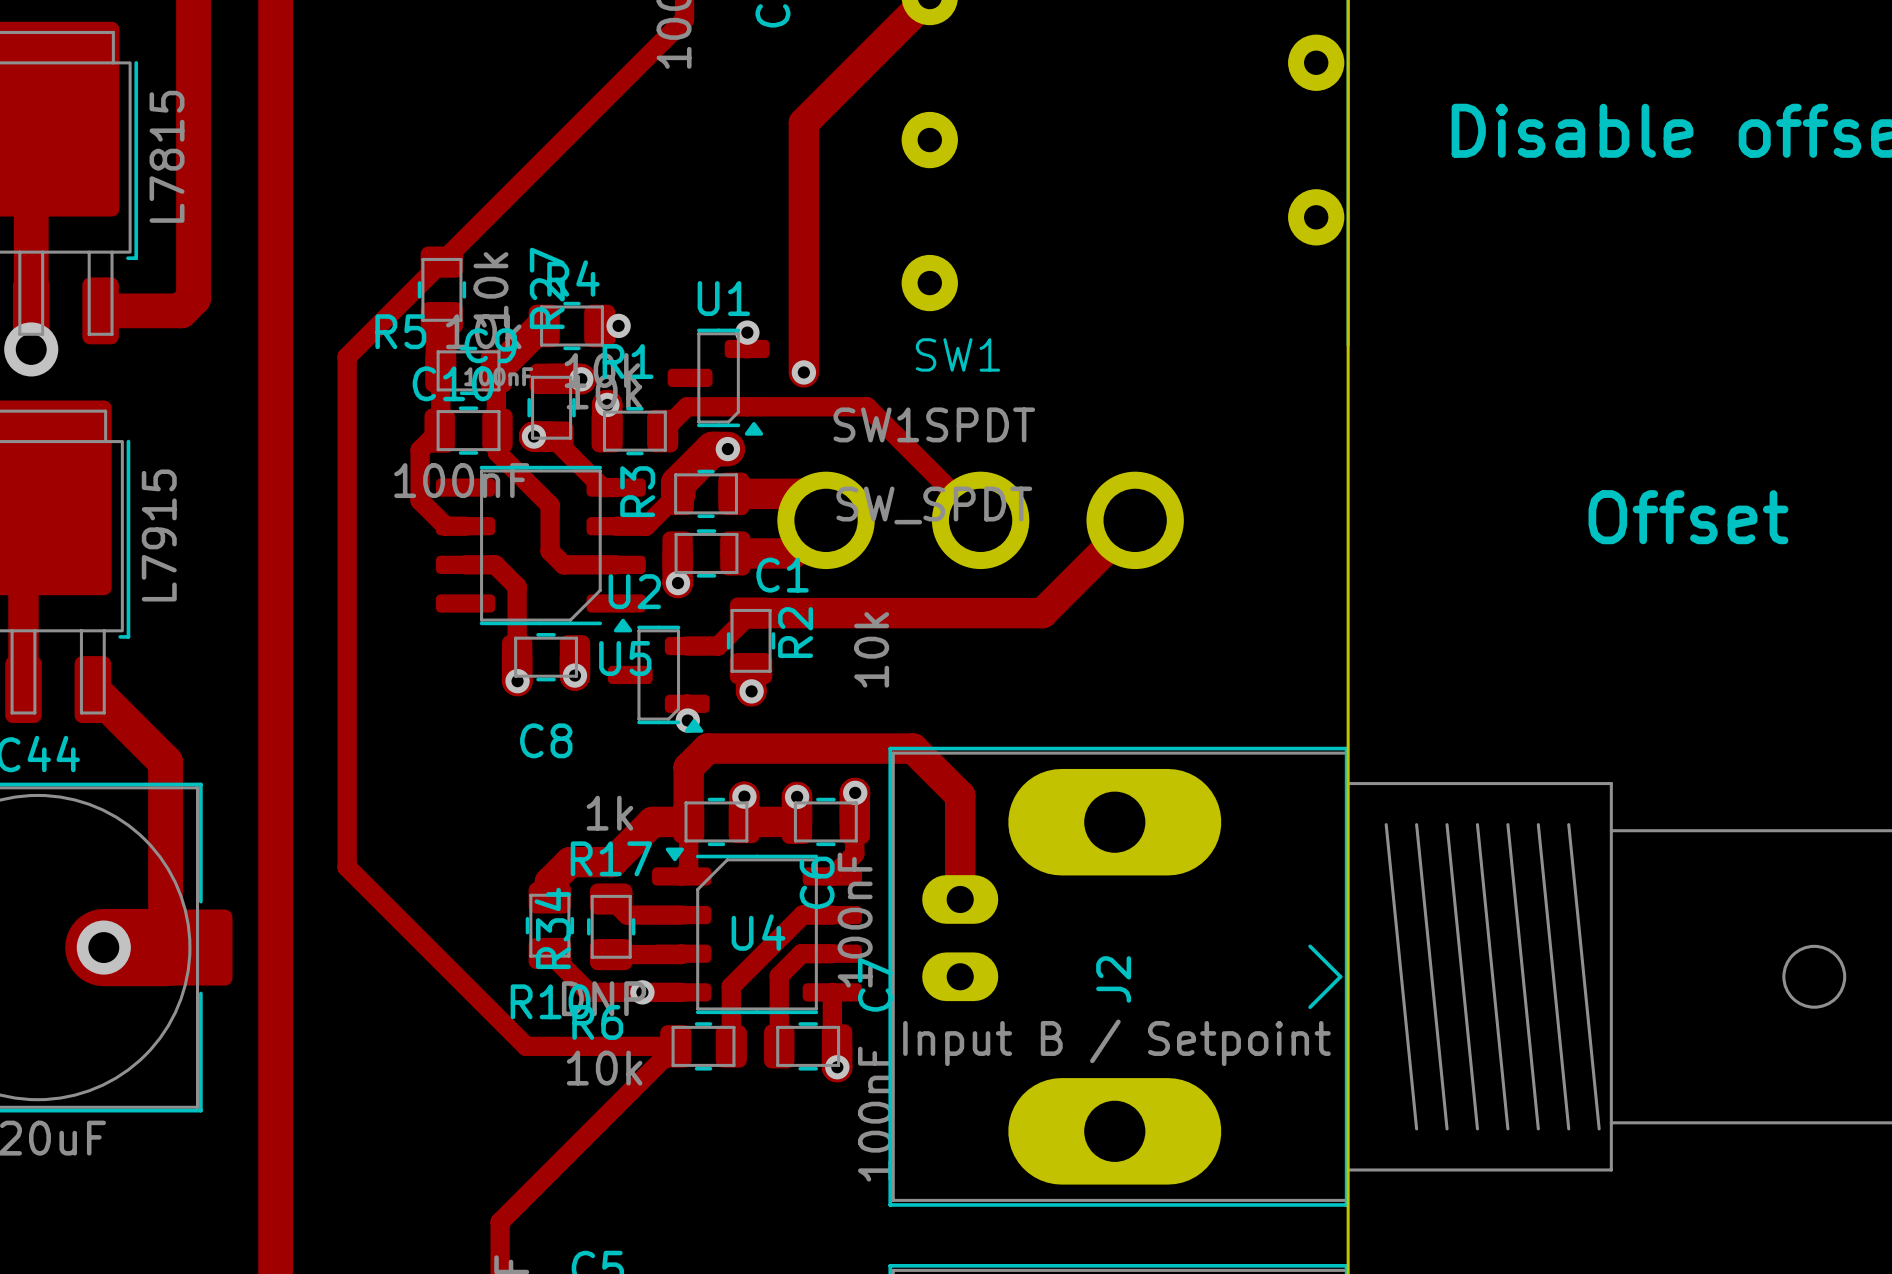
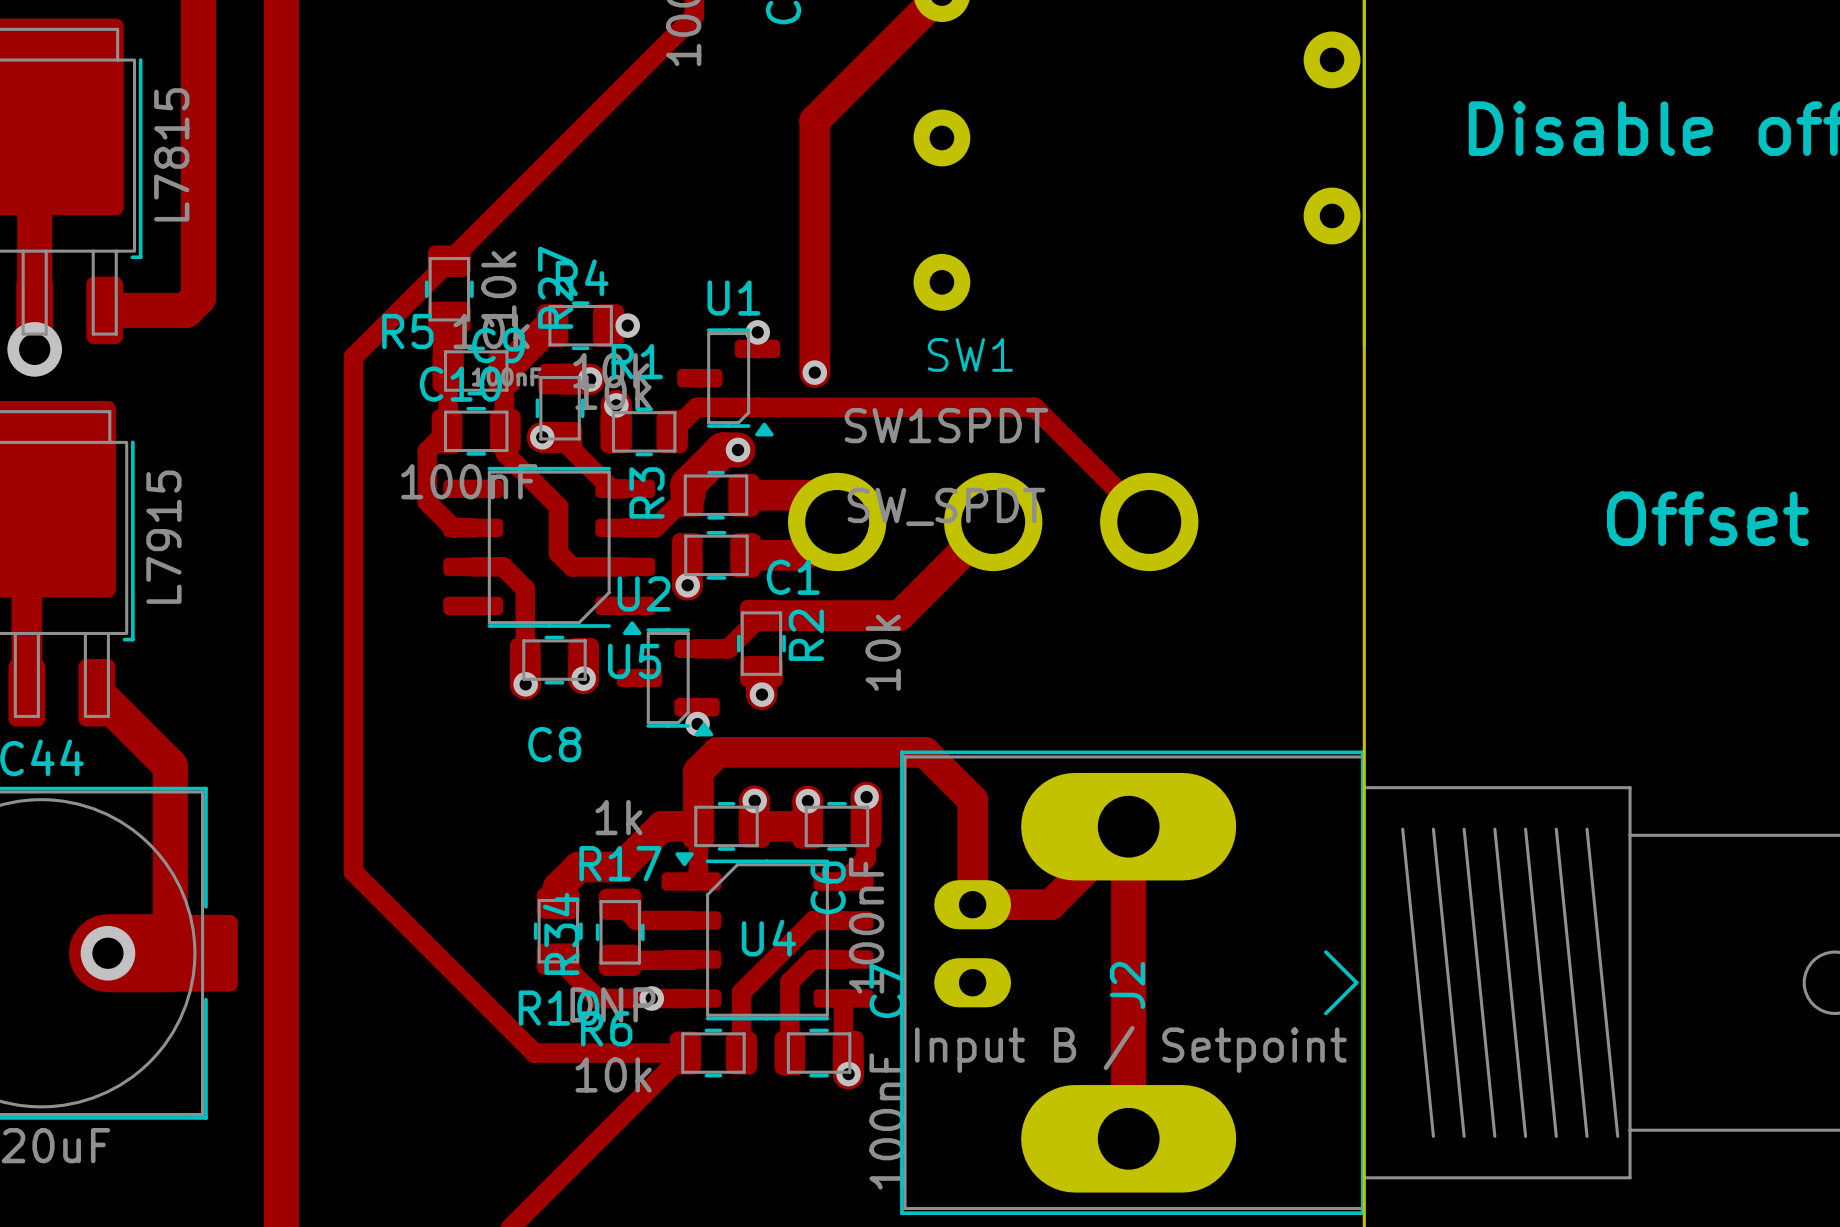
track: (867, 406) (980, 520) -> (878, 407) (1034, 407) (1149, 521)
track: (1135, 520) (1042, 613) (887, 613) -> (993, 521) (899, 615)
track: none -> (972, 904) (1050, 904) (1128, 826) (1128, 1138)

